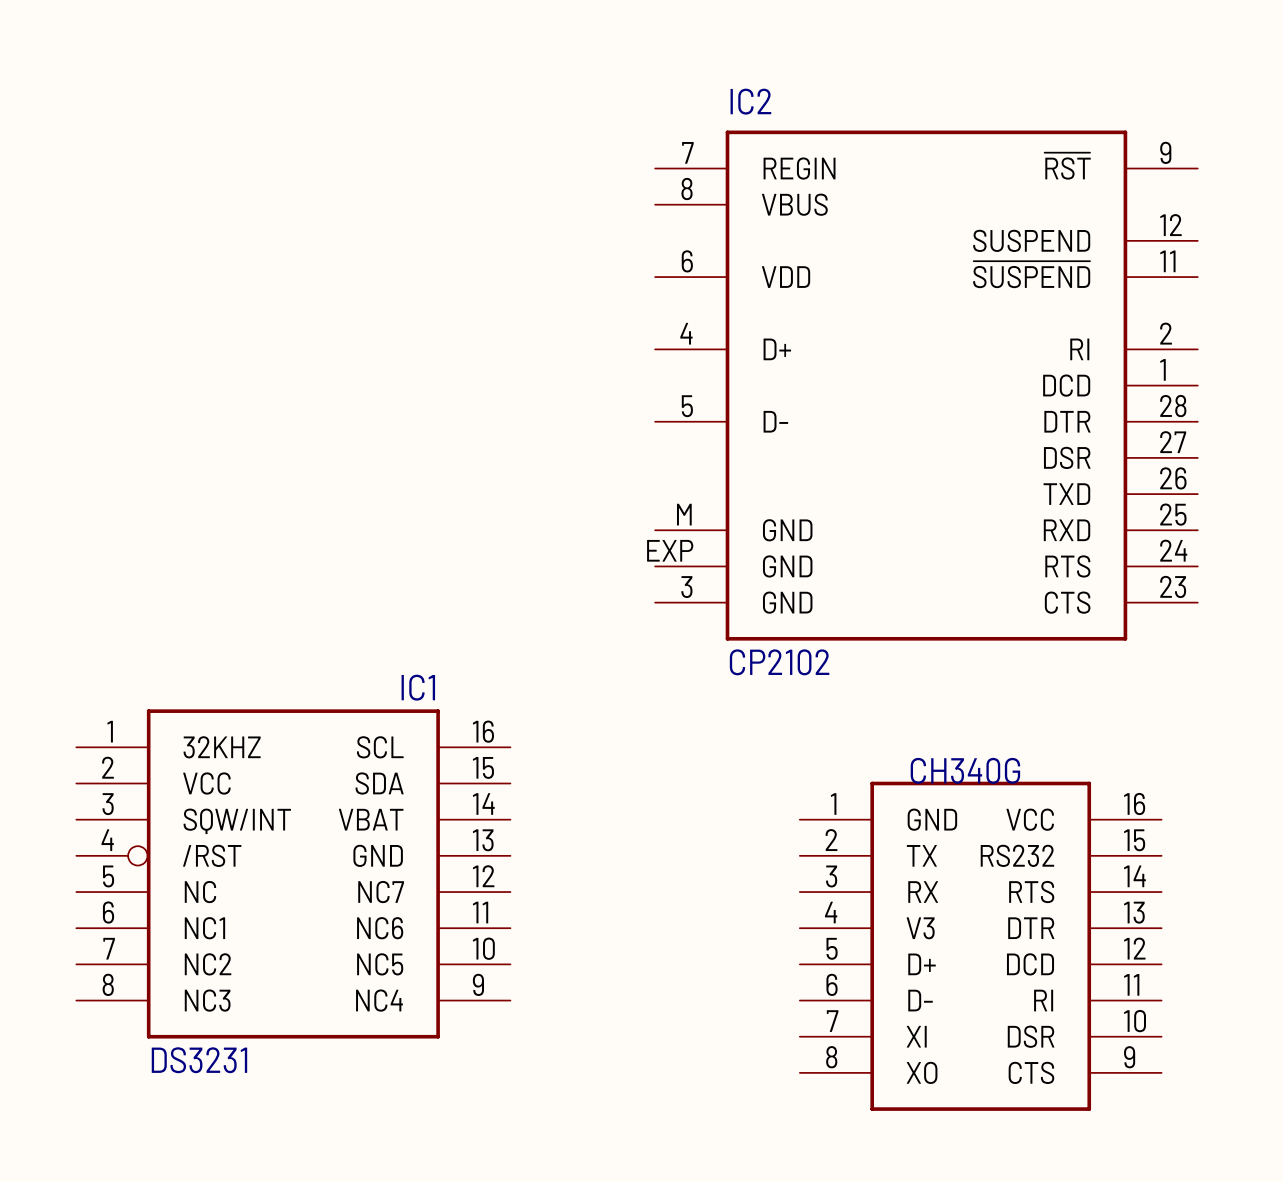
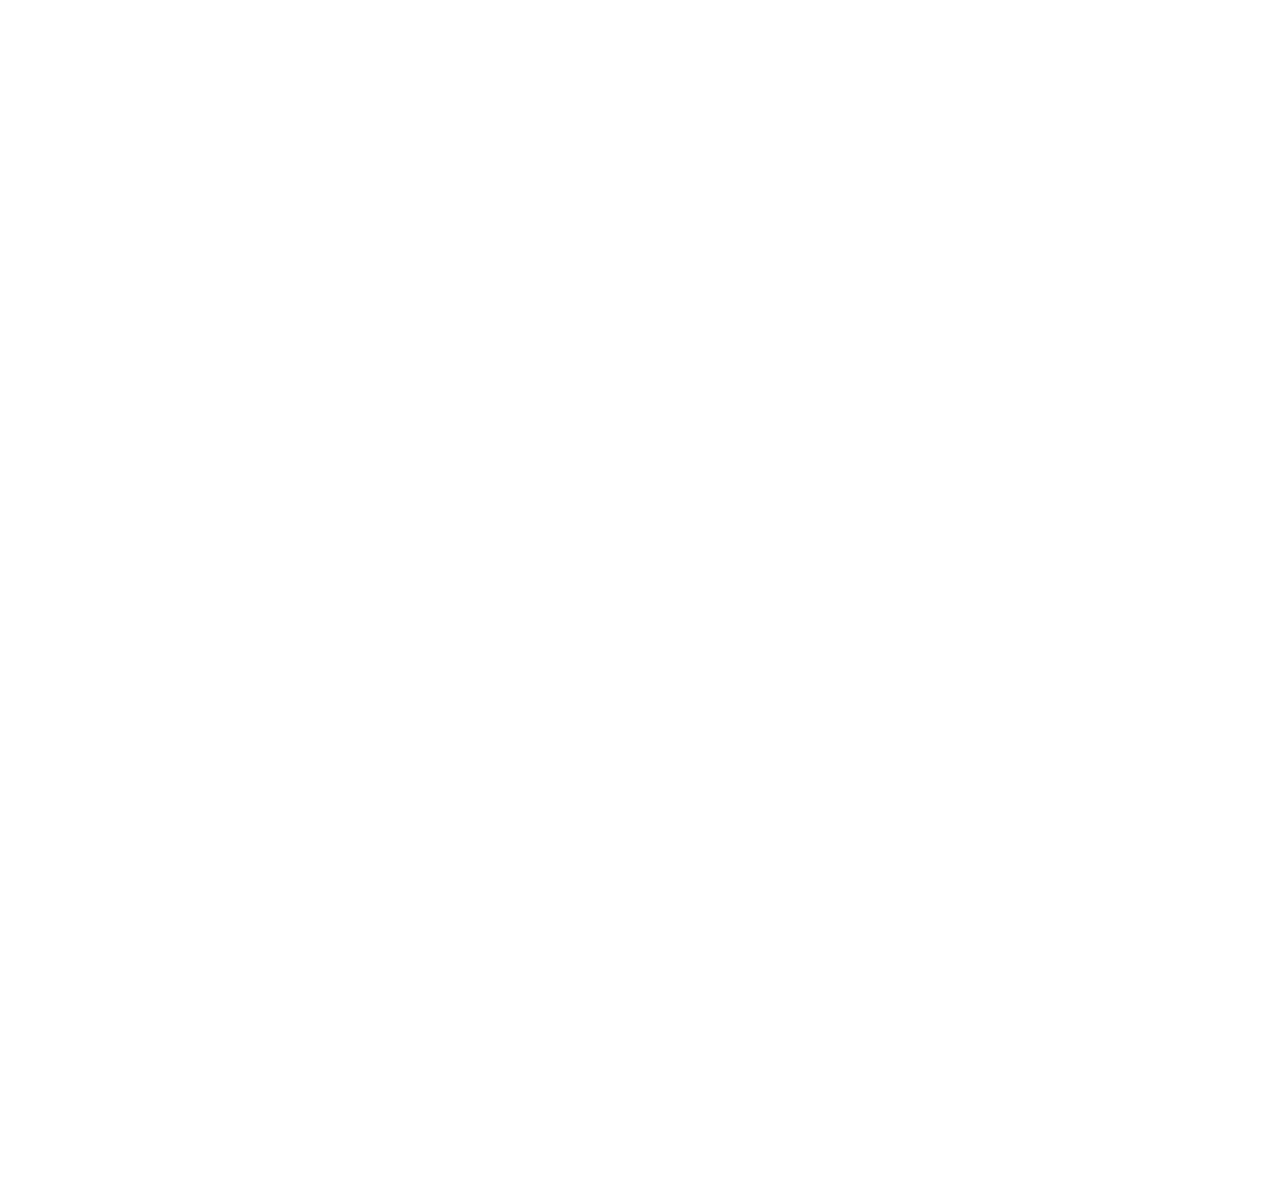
IC2: CP2102 (926, 385) -> none
IC1: (293, 873) -> none
part: (980, 946) -> none

